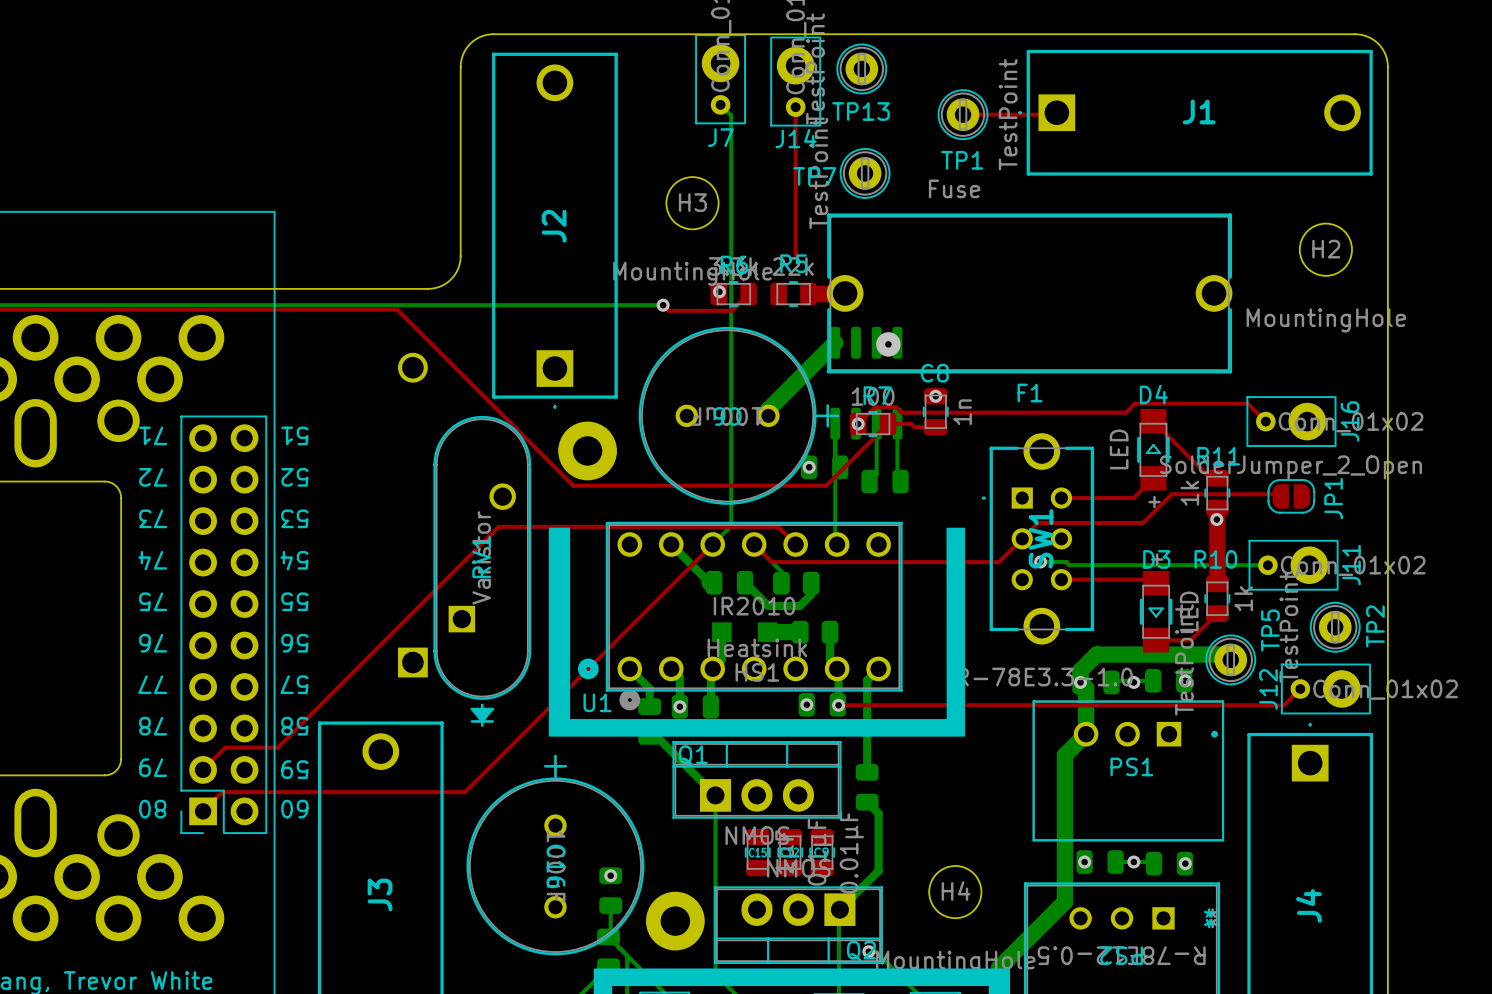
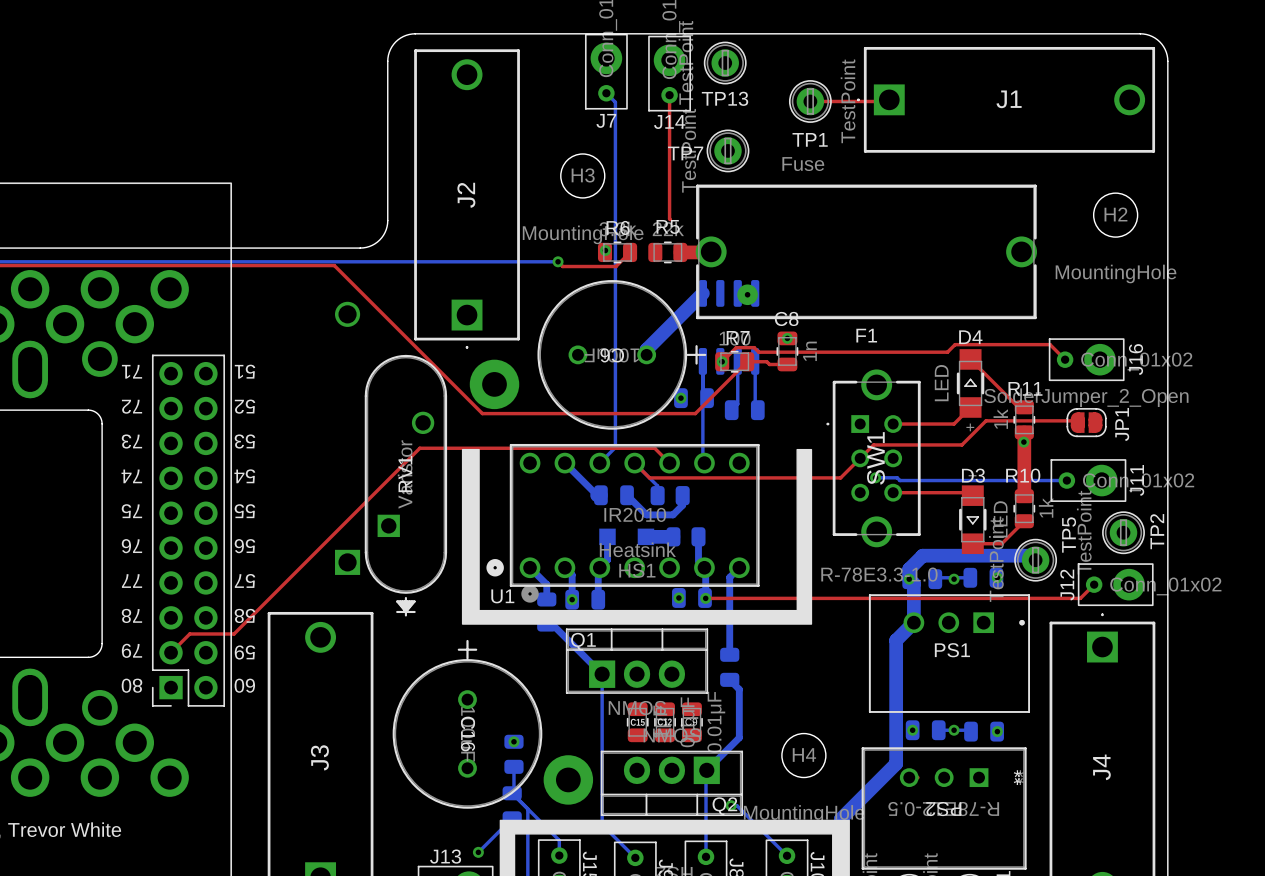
top track: (712, 544) (465, 792) (222, 792) (203, 811) -> none

